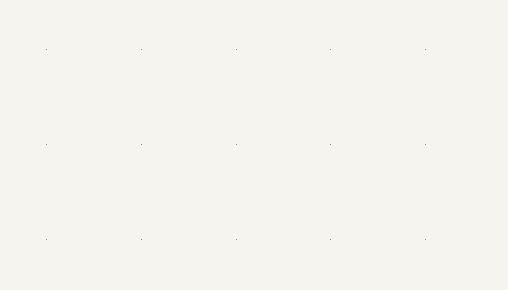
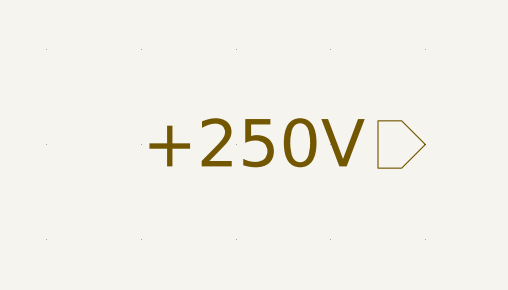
hierarchical label: none -> +250V (257, 142)

